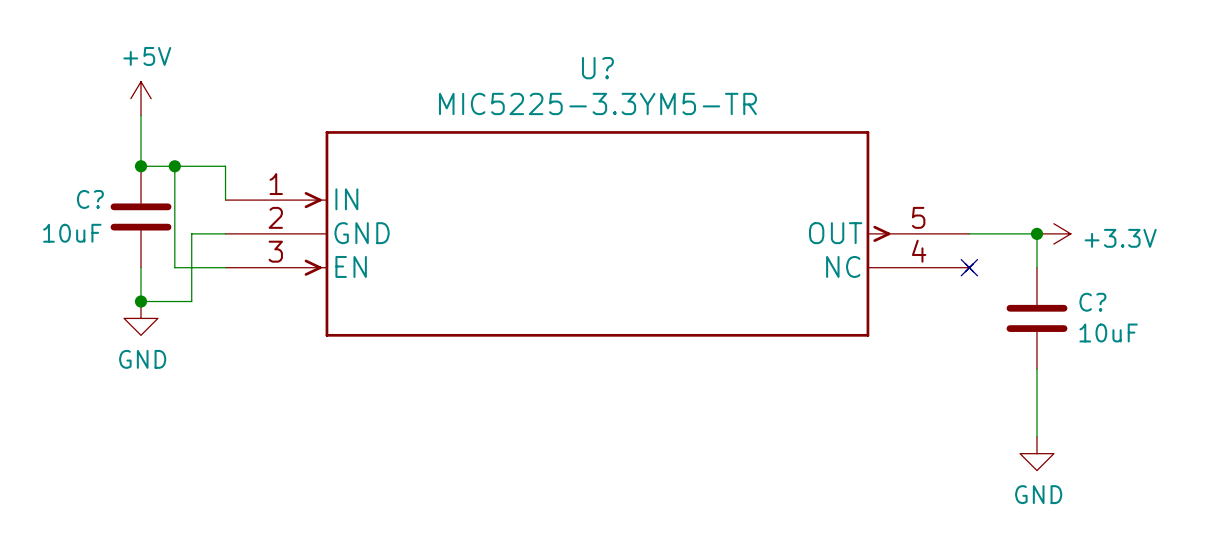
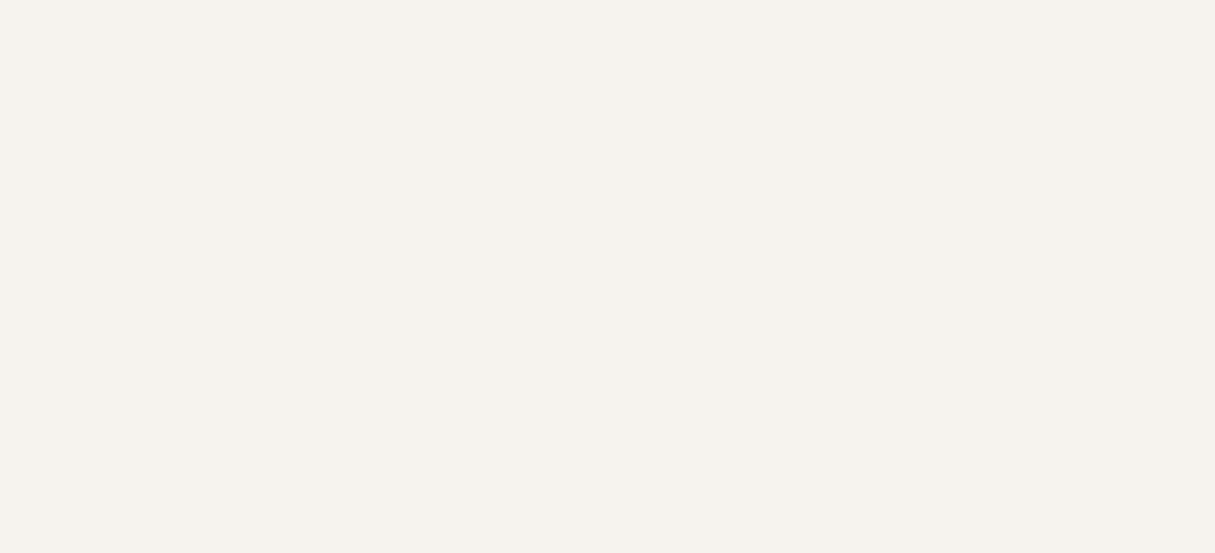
power symbol: +5V (141, 98) -> none
wire: (141, 115) (141, 166) (225, 166) (225, 200) -> none
junction: (141, 166) -> none
wire: (174, 166) (174, 267) (225, 267) -> none
junction: (174, 166) -> none
C?: 10uF (141, 216) -> none
wire: (225, 233) (191, 233) (191, 301) (141, 301) (141, 267) -> none
U?: MIC5225-3.3YM5-TR (599, 233) -> none
wire: (969, 233) (1036, 233) (1036, 267) -> none
junction: (1036, 233) -> none
power symbol: +3.3V (1053, 233) -> none
no-connect mark: (969, 267) -> none
junction: (141, 301) -> none
power symbol: GND (141, 318) -> none
C?: 10uF (1036, 318) -> none
wire: (1036, 369) (1036, 436) -> none
power symbol: GND (1036, 453) -> none

